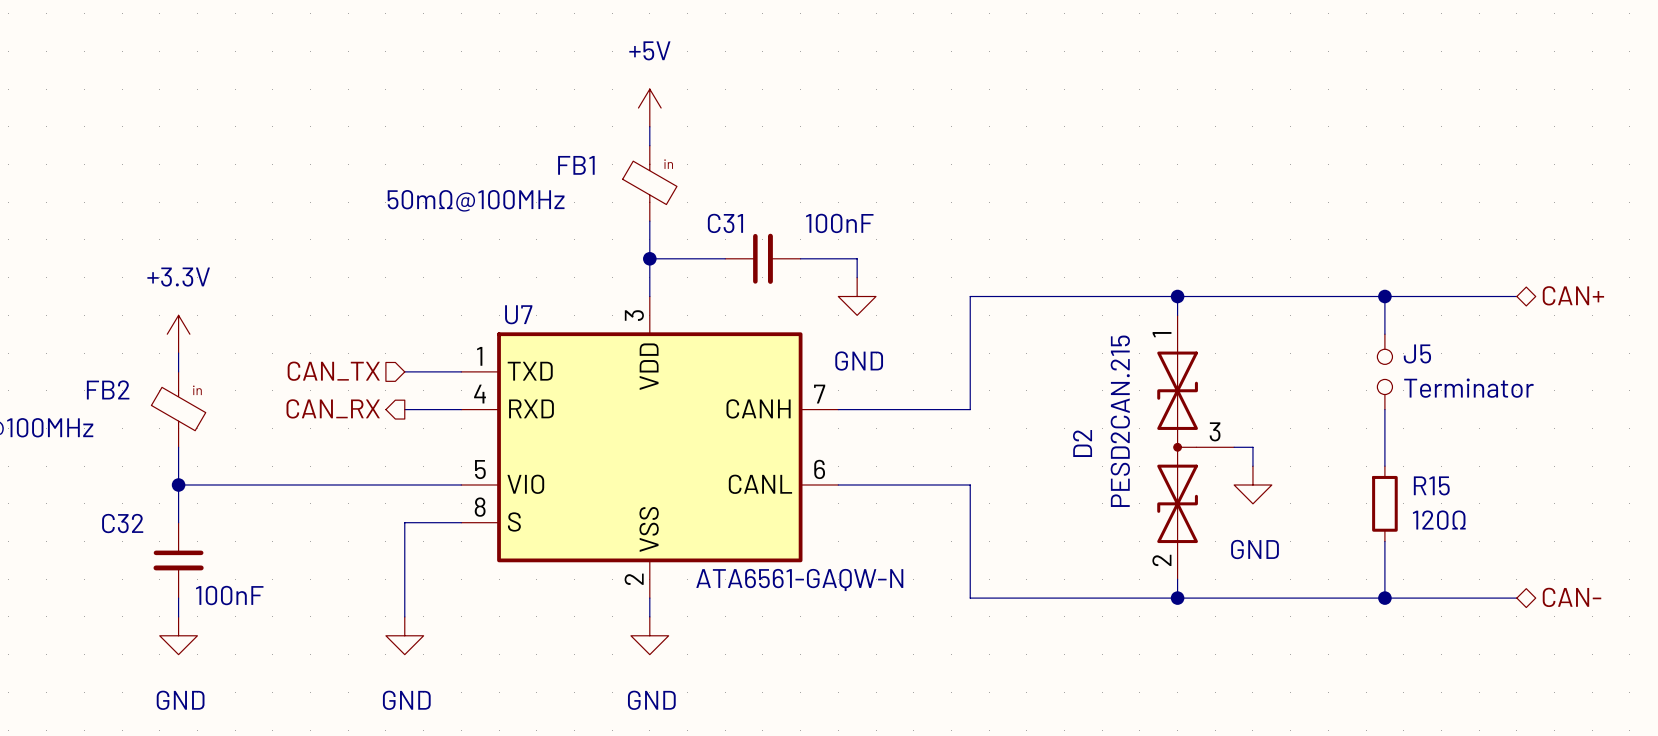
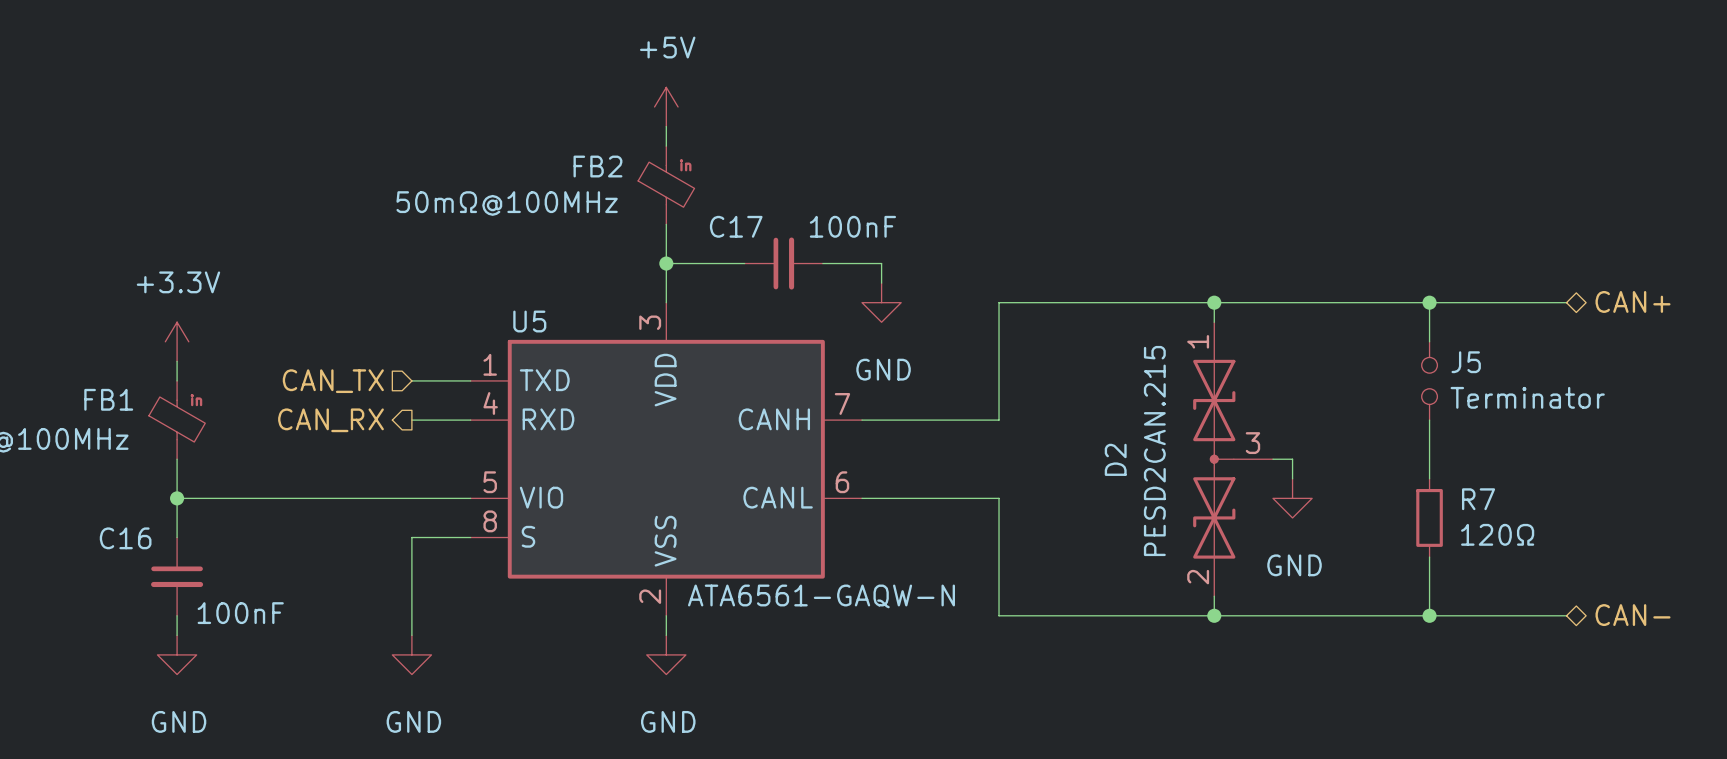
FB1 name: FB1 (576, 165) -> FB2 (597, 166)
C31 name: C31 (725, 223) -> C17 (736, 226)
U7 name: U7 (518, 314) -> U5 (529, 321)
FB2 name: FB2 (108, 389) -> FB1 (108, 399)
R15 name: R15 (1431, 485) -> R7 (1478, 499)
C32 name: C32 (122, 523) -> C16 (125, 538)

